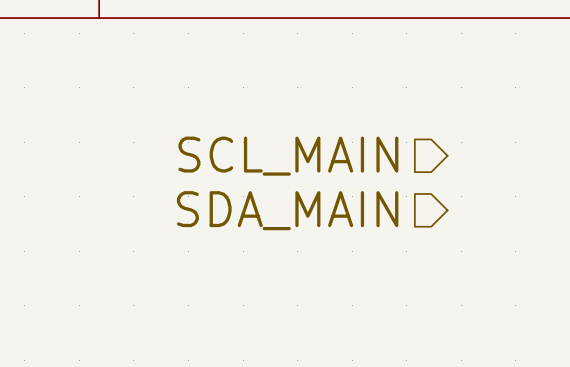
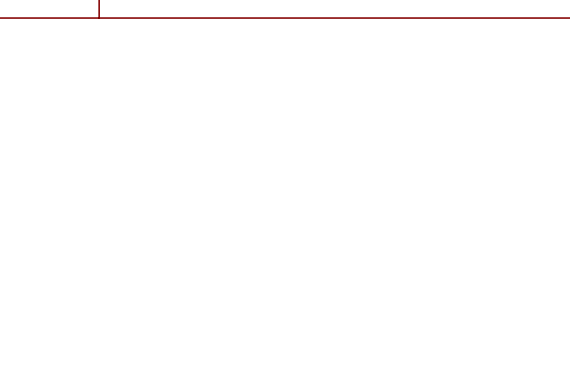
hierarchical label: SCL_MAIN (288, 156) -> none
hierarchical label: SDA_MAIN (287, 210) -> none

